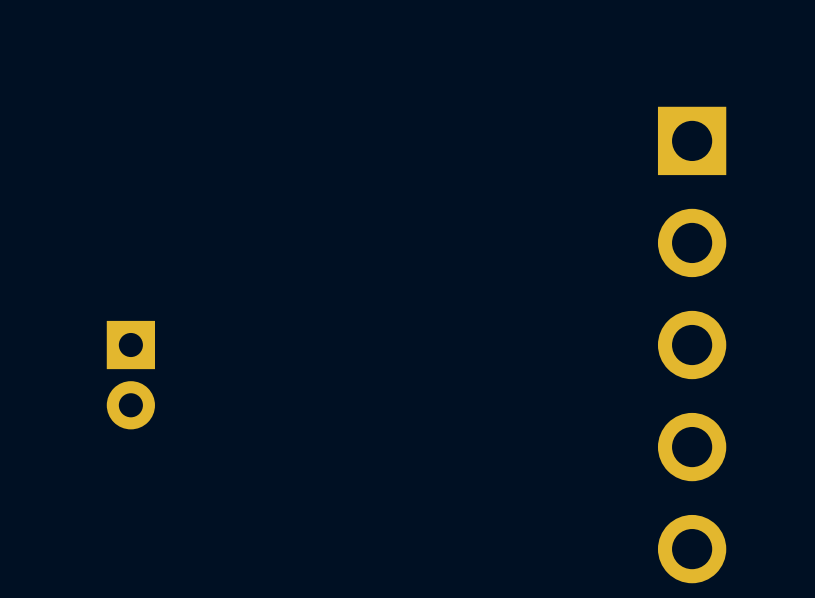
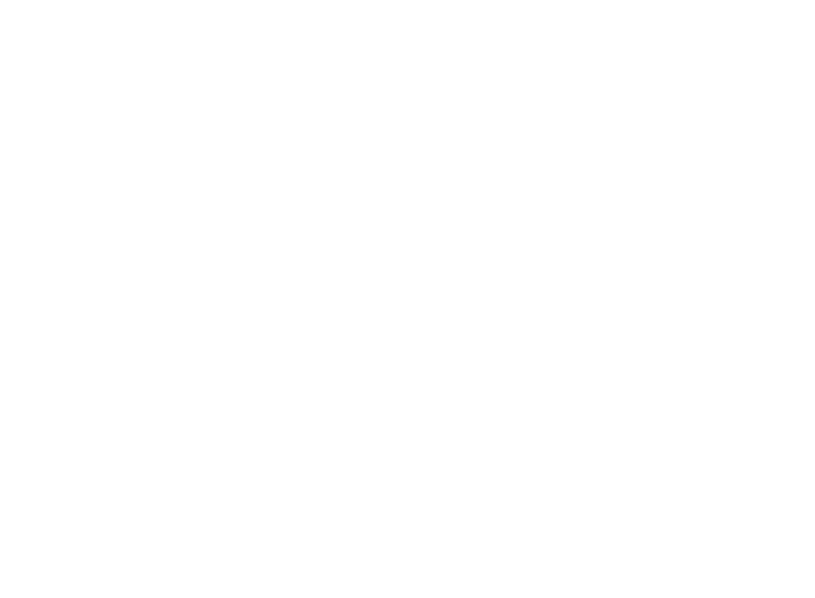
part: (692, 345) -> none
part: (130, 375) -> none

